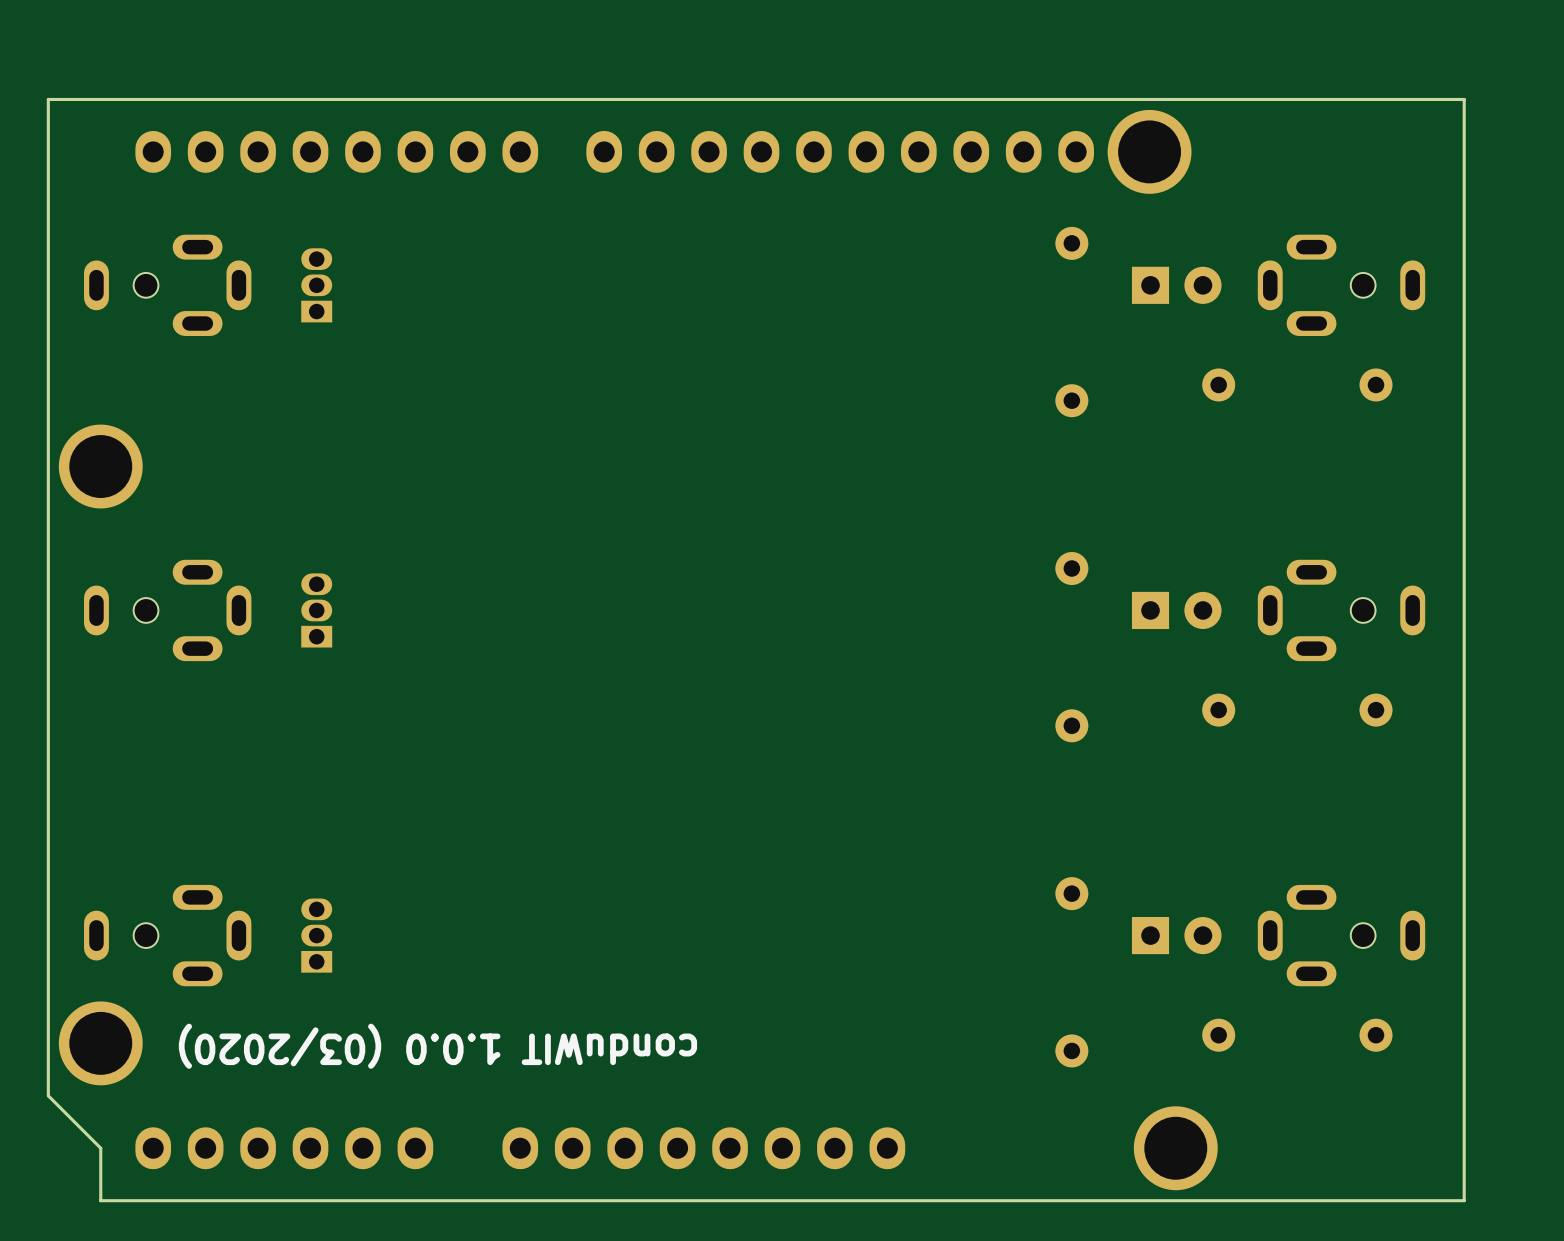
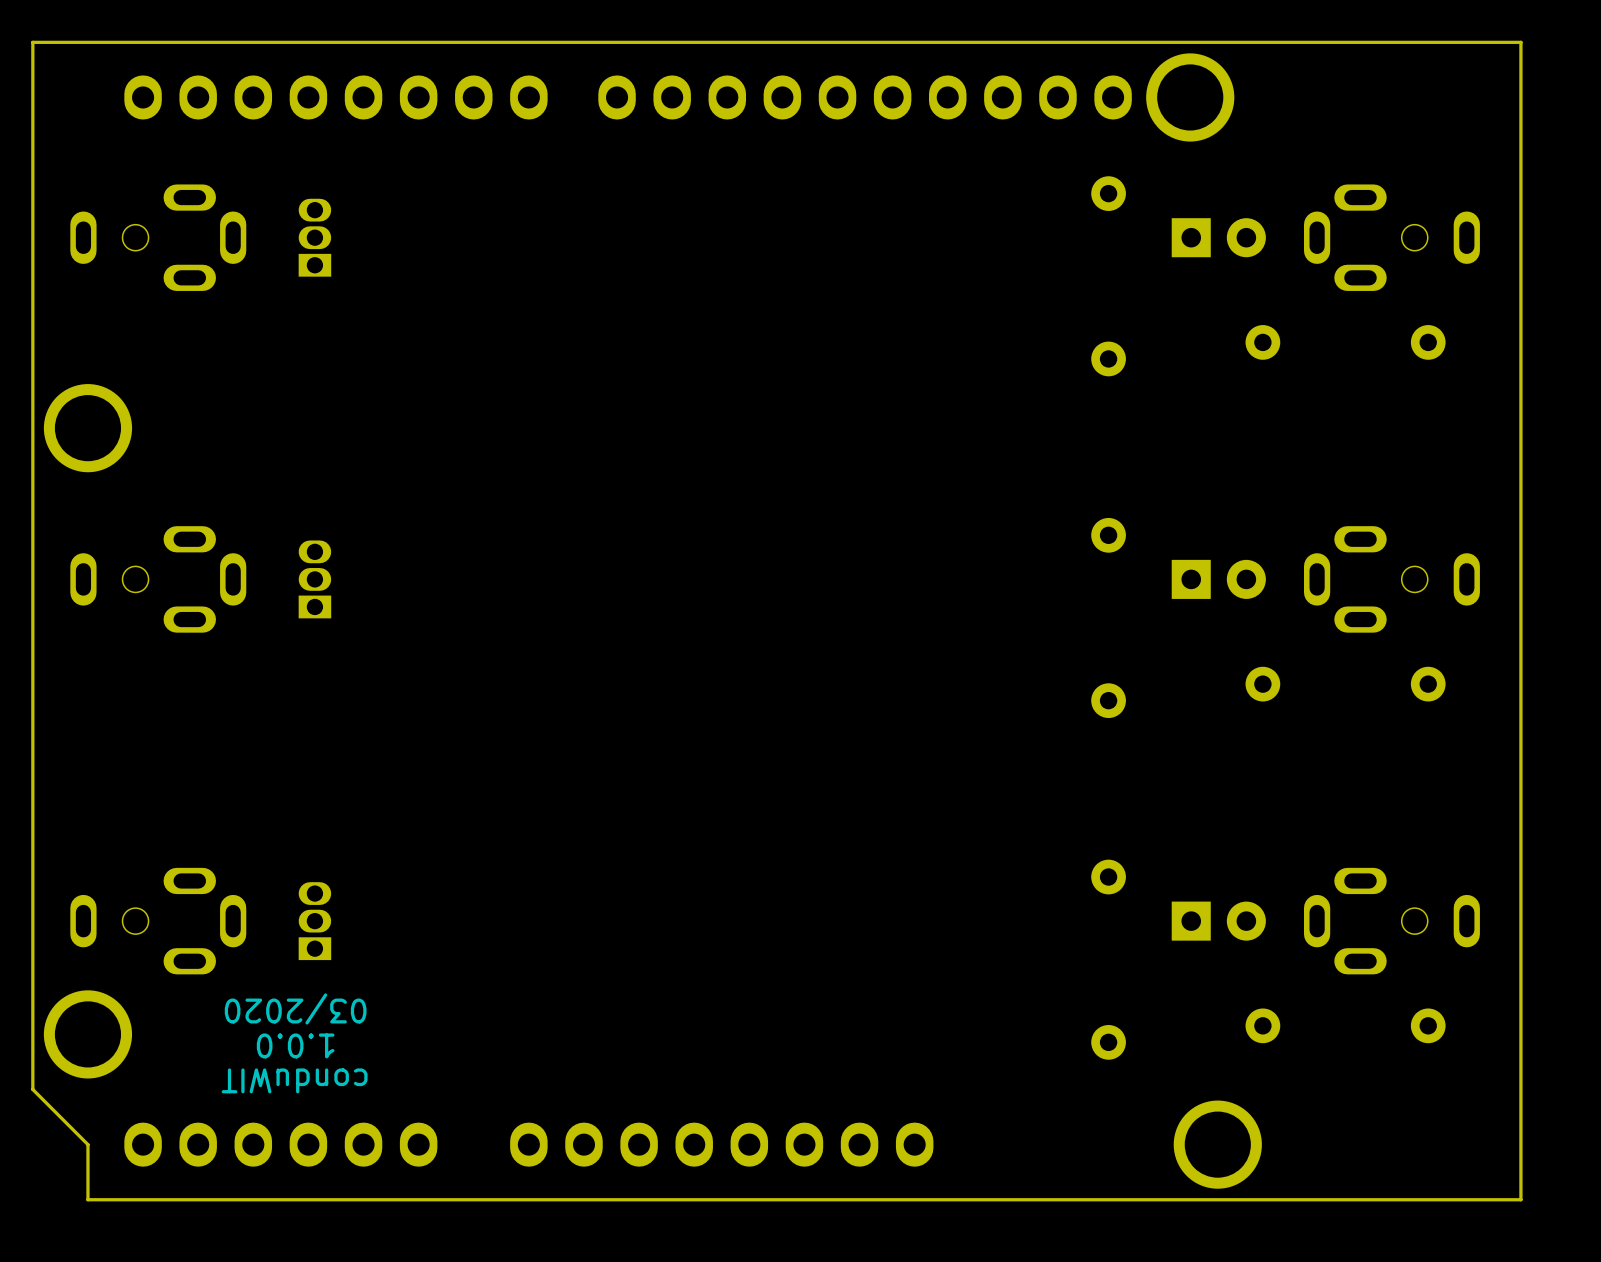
text: none -> 03/2020 (295, 1008)
text: conduWIT 1.0.0 (03/2020) (437, 1046) -> none
text: none -> 1.0.0 (295, 1045)
text: none -> conduWIT (294, 1080)

